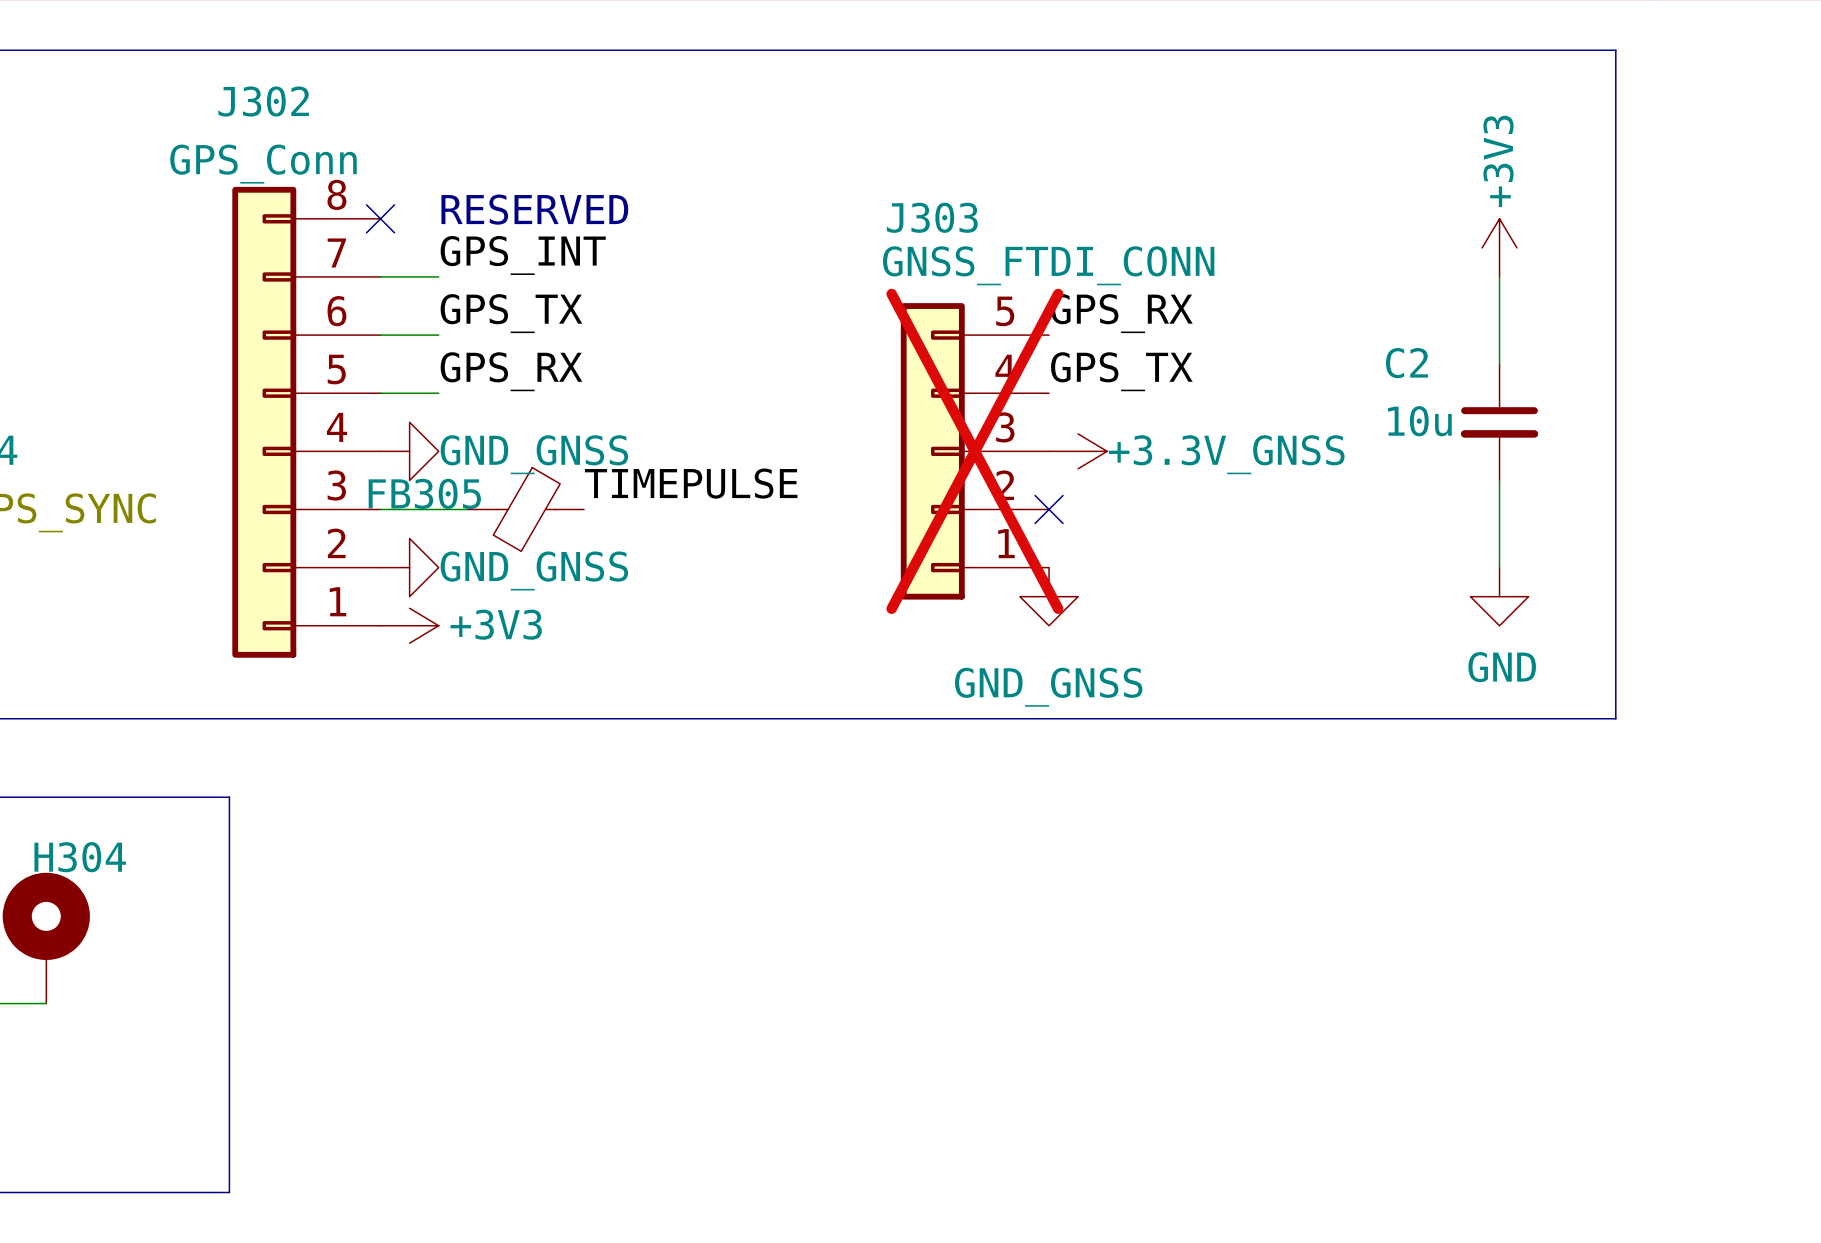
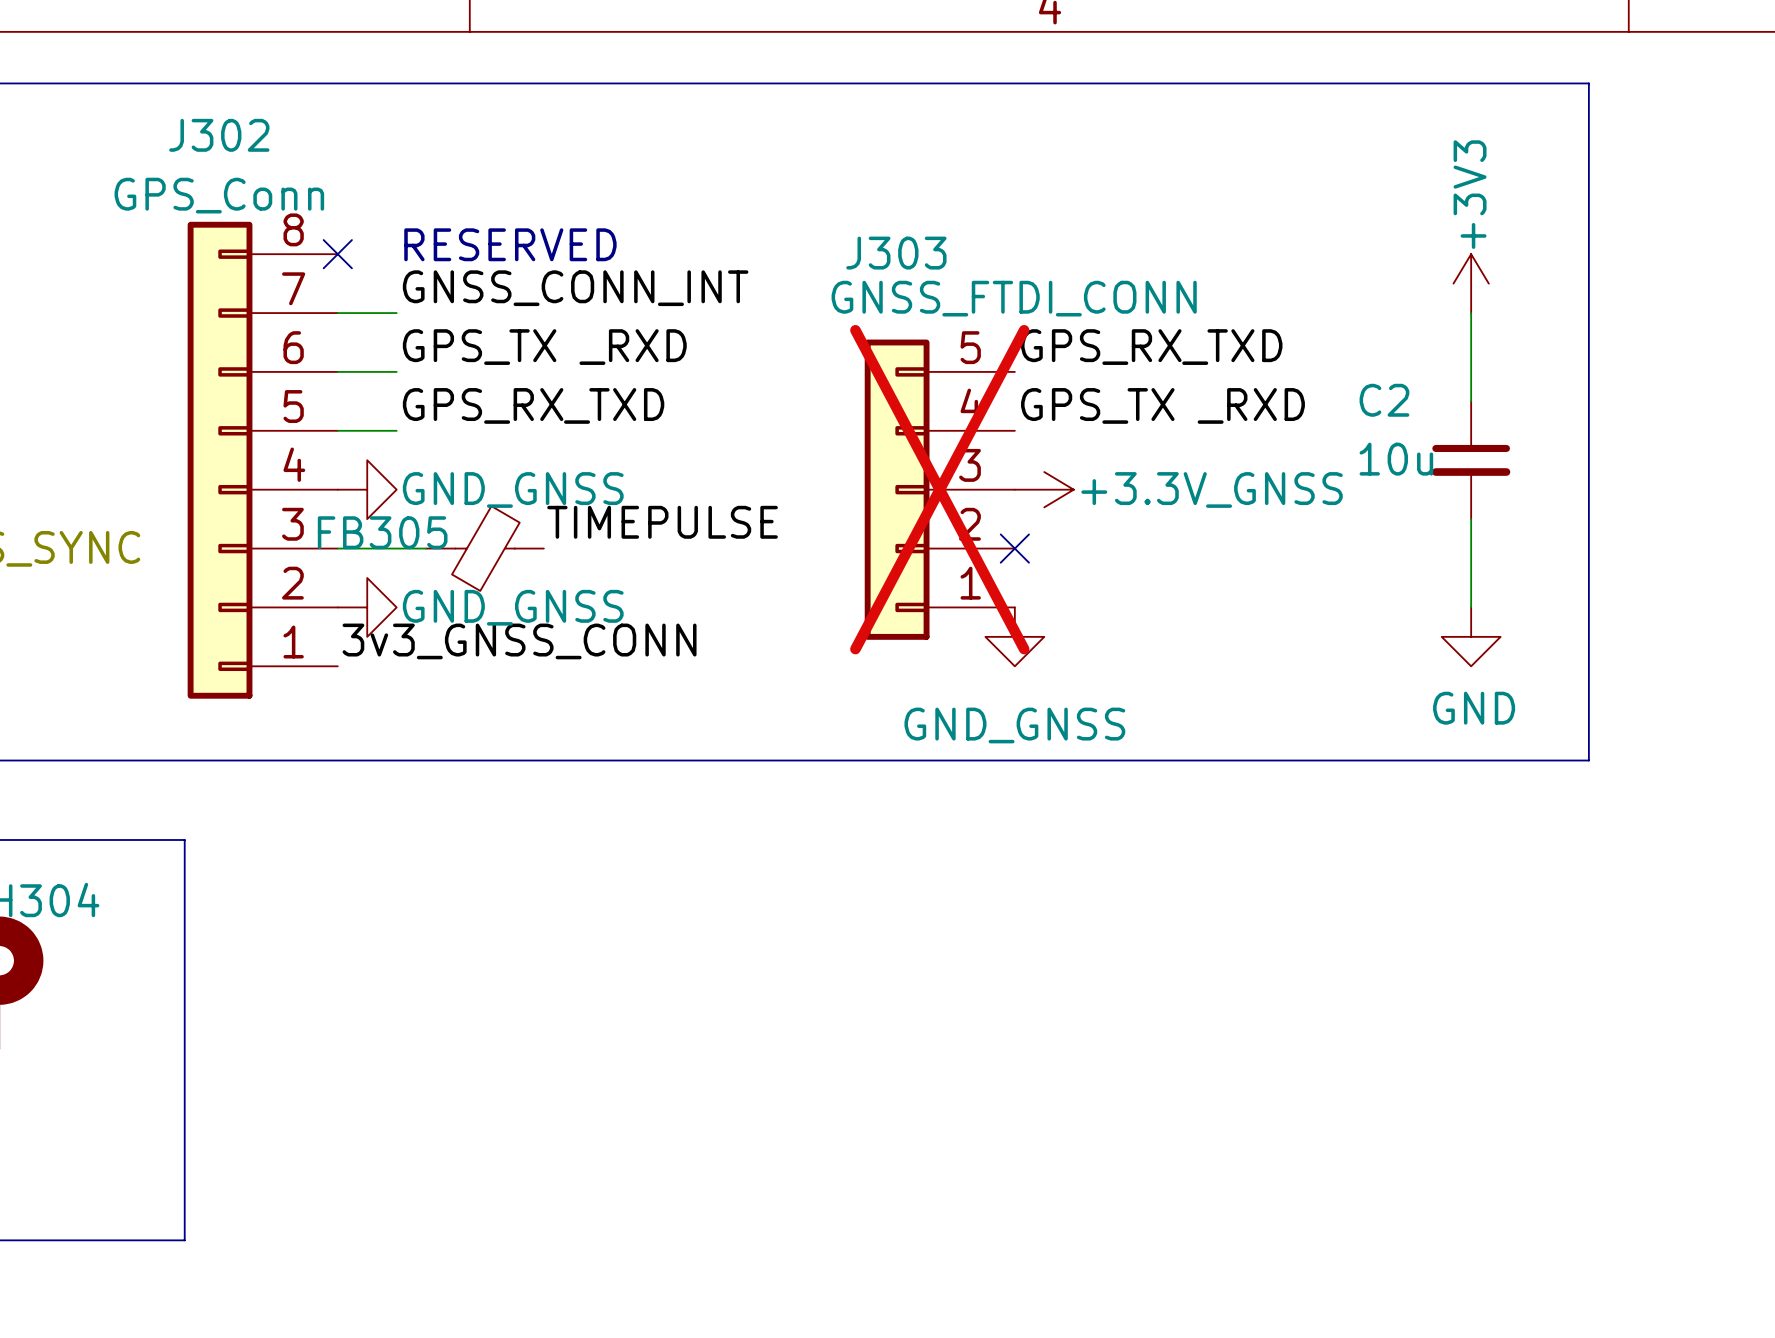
label: GPS_INT (523, 255) -> GNSS_CONN_INT (575, 288)
label: GPS_TX (511, 313) -> GPS_TX _RXD (544, 347)
label: GPS_RX (1121, 313) -> GPS_RX_TXD (1151, 347)
label: GPS_RX (511, 371) -> GPS_RX_TXD (533, 405)
label: GPS_TX (1121, 371) -> GPS_TX _RXD (1162, 405)
label: none -> 3v3_GNSS_CONN (519, 641)
power symbol: +3V3 (409, 625) -> none

